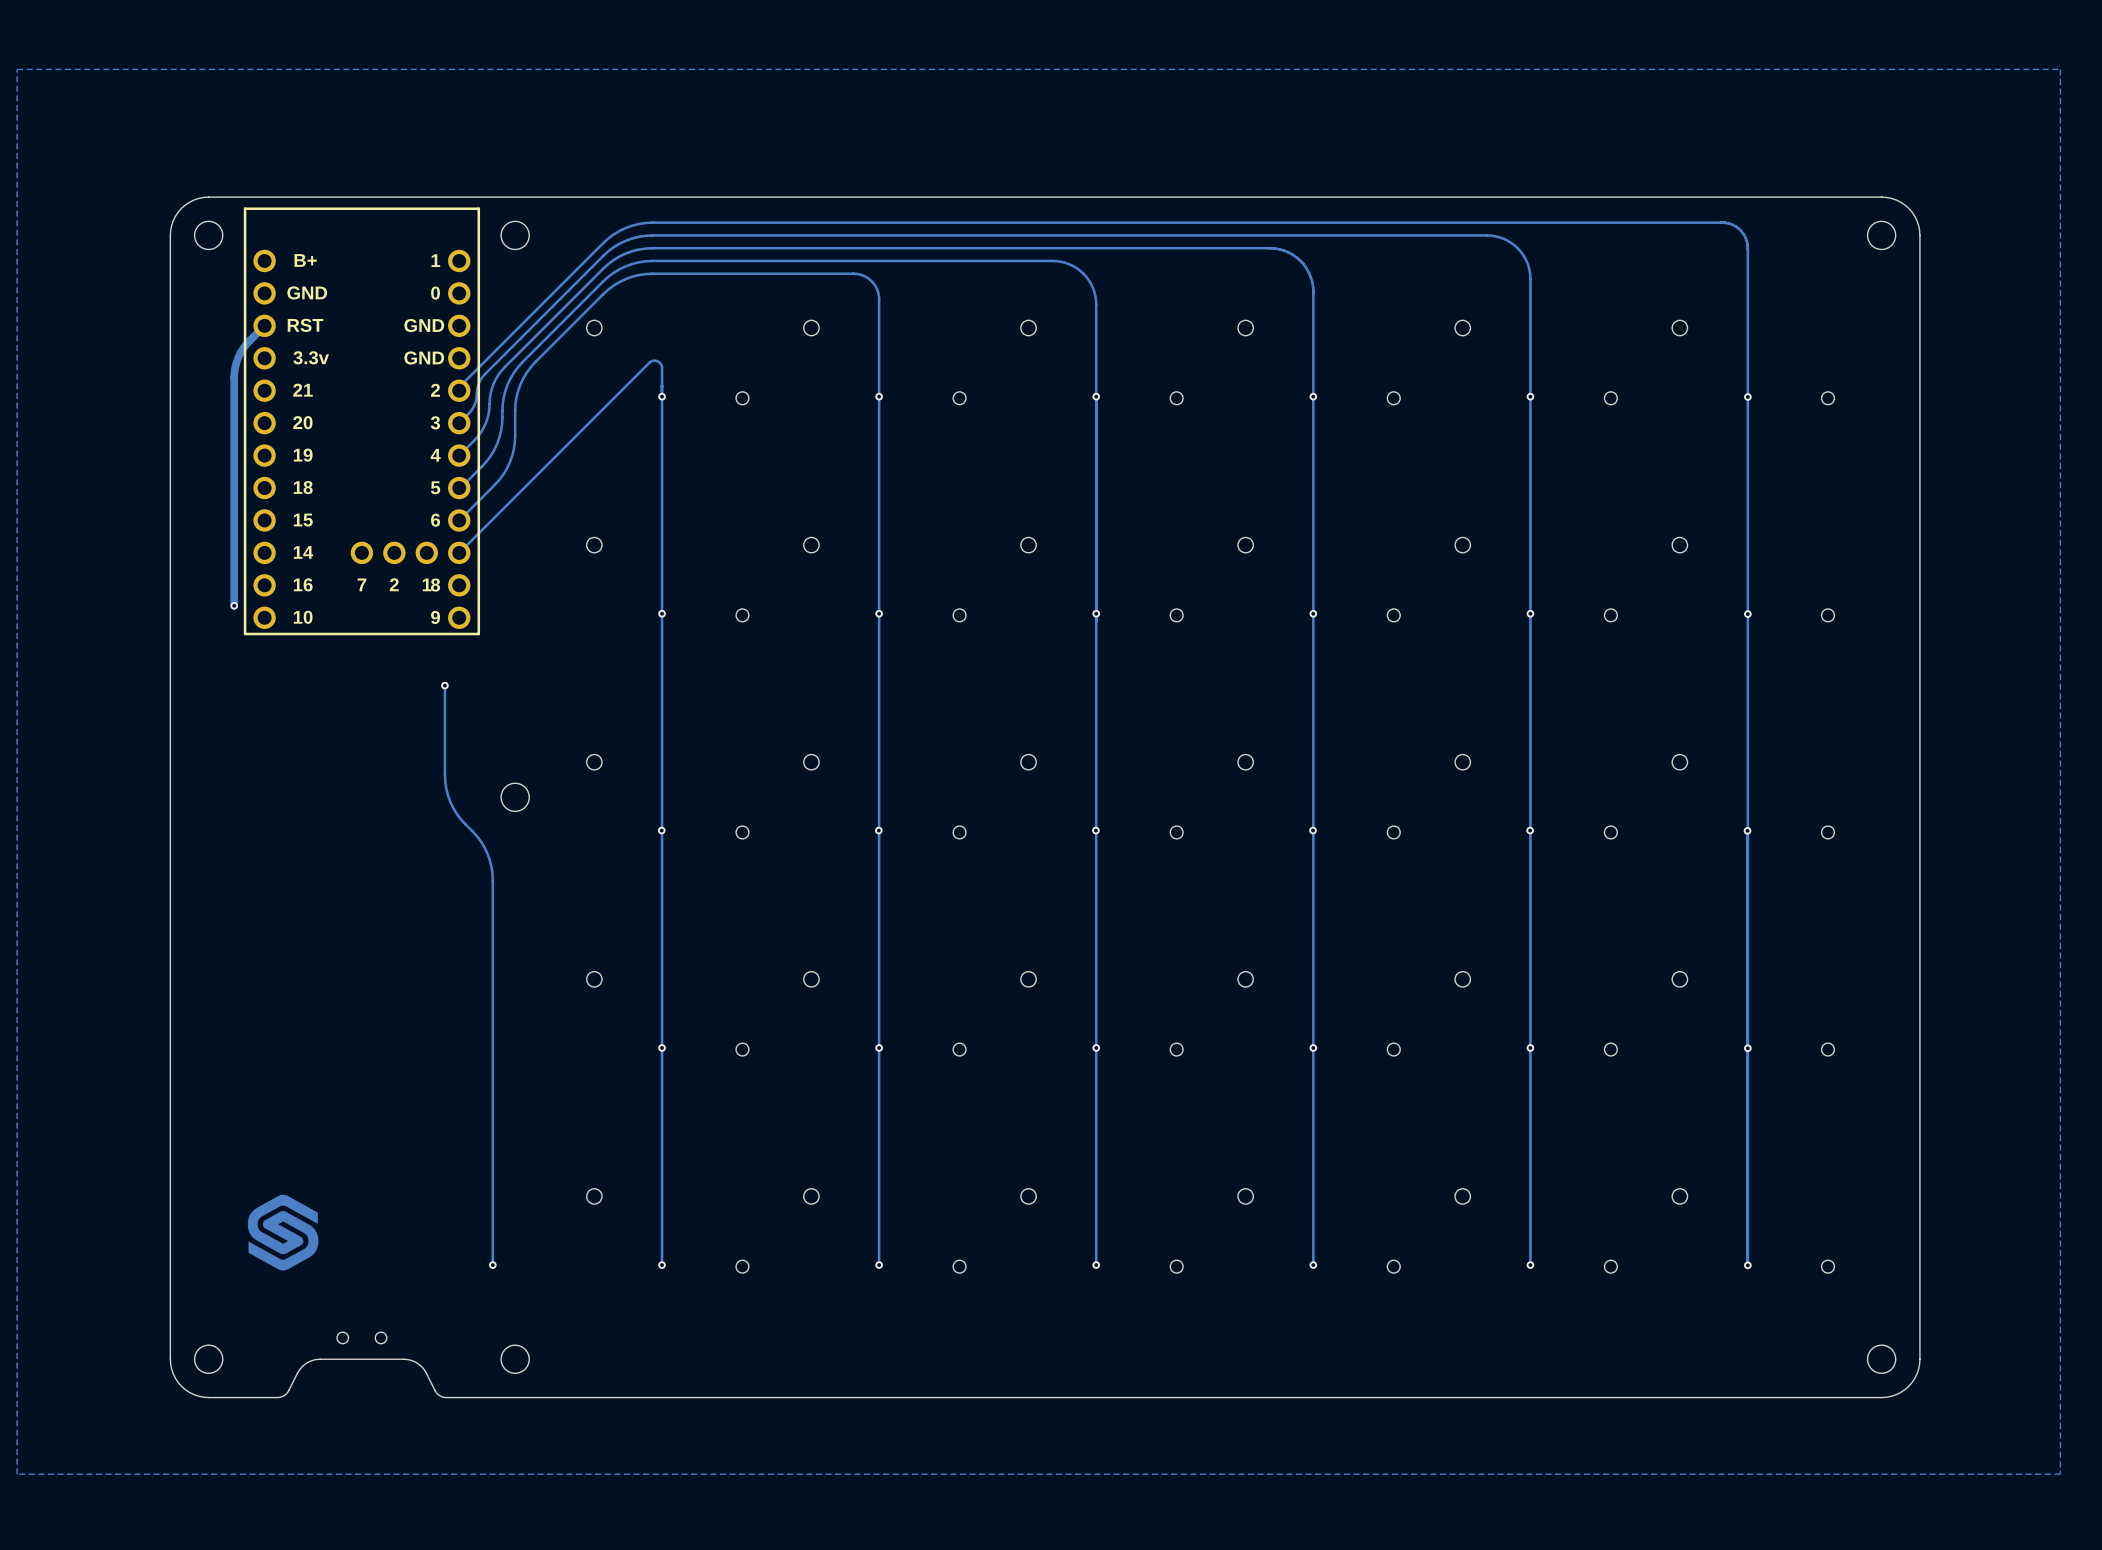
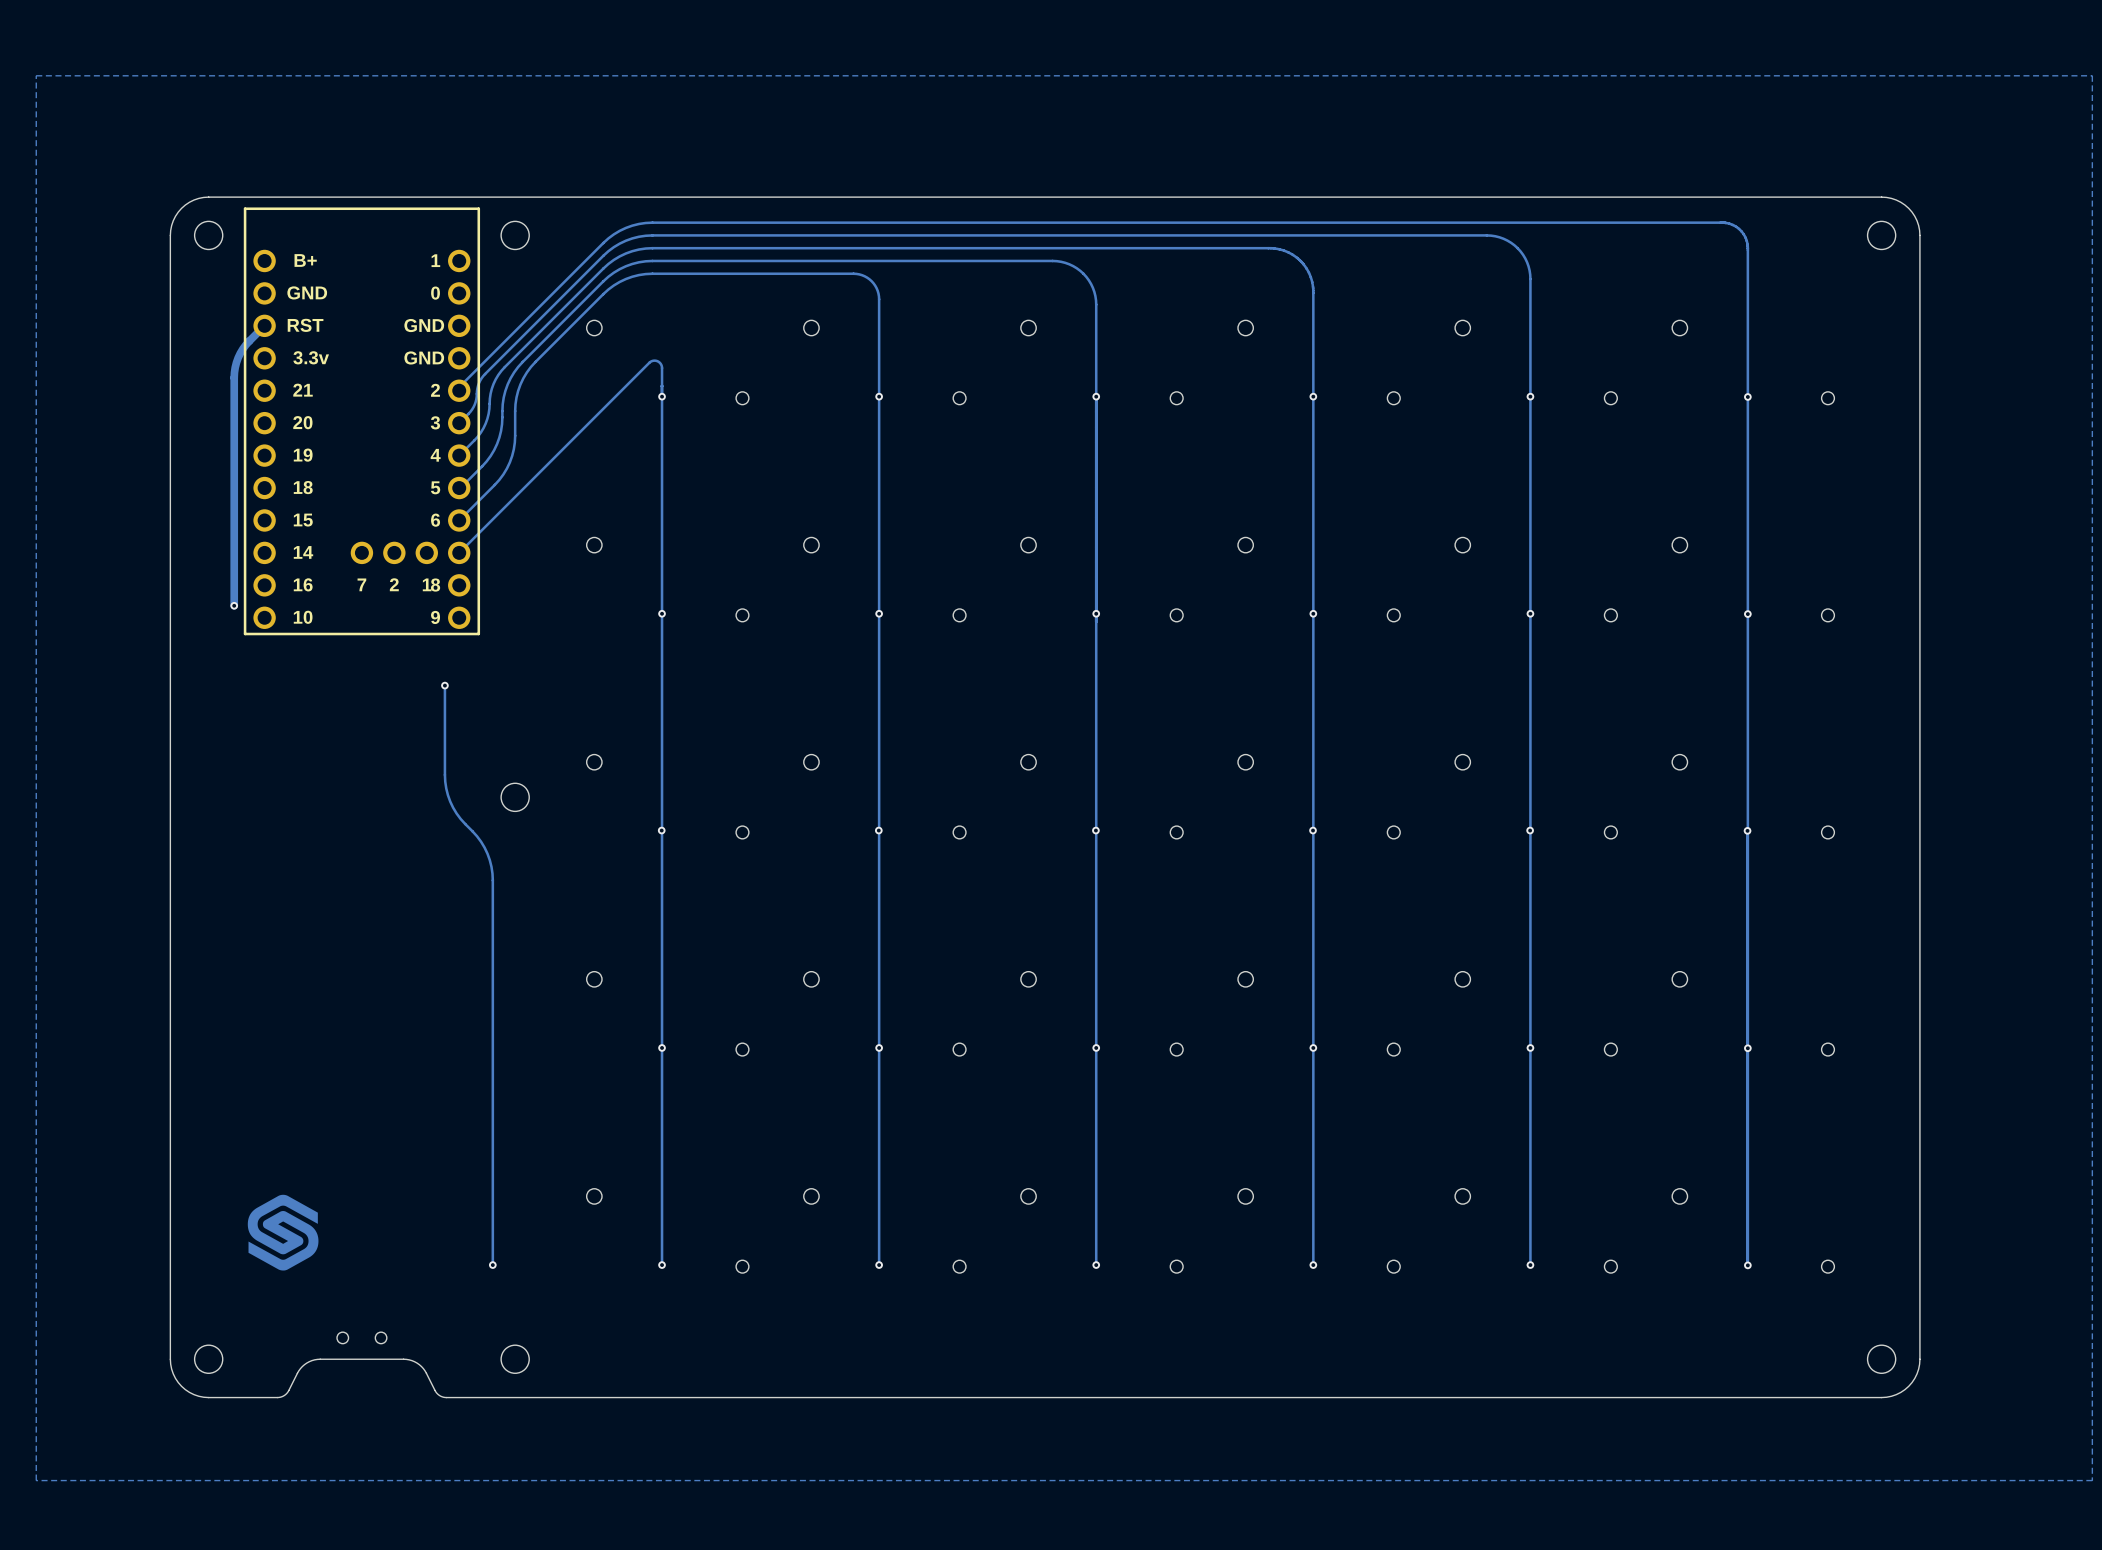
zone outline: (2060, 69) (2060, 1474) (17, 1474) (17, 69) (2060, 69) -> (2092, 75) (2092, 1480) (36, 1480) (36, 75) (2092, 75)

